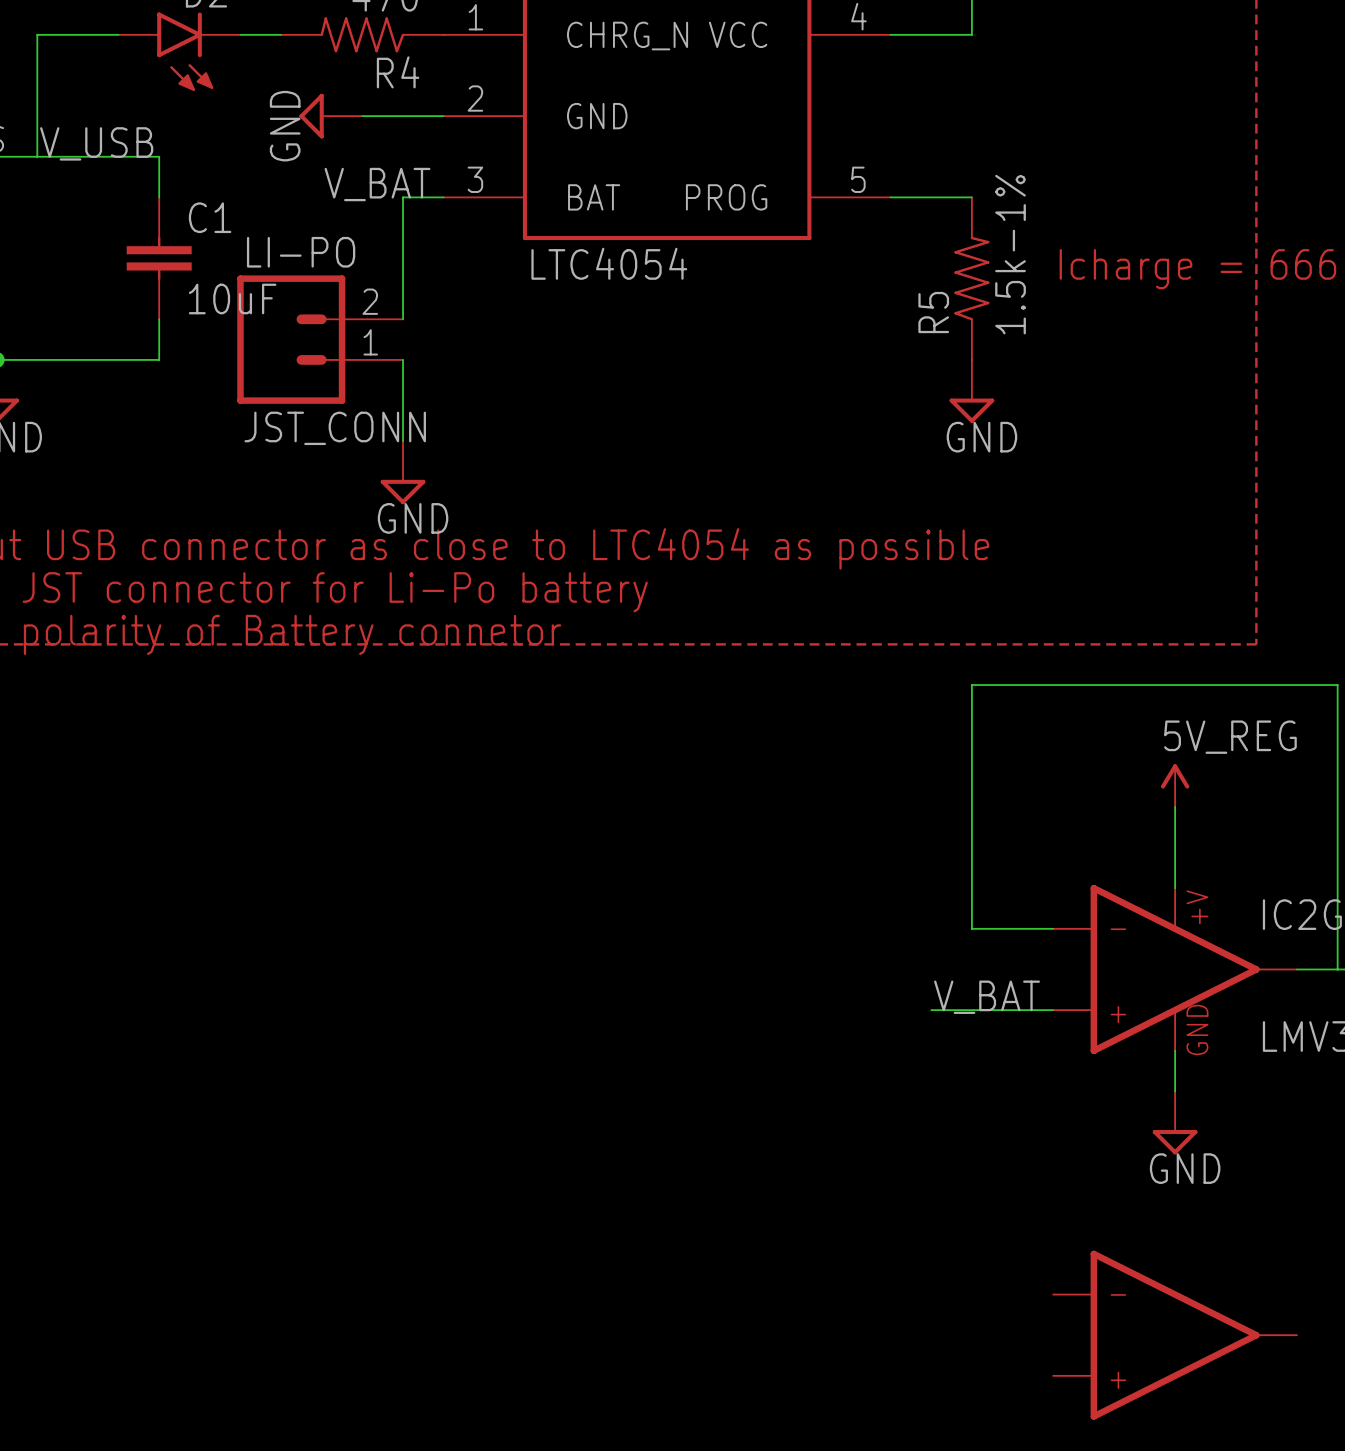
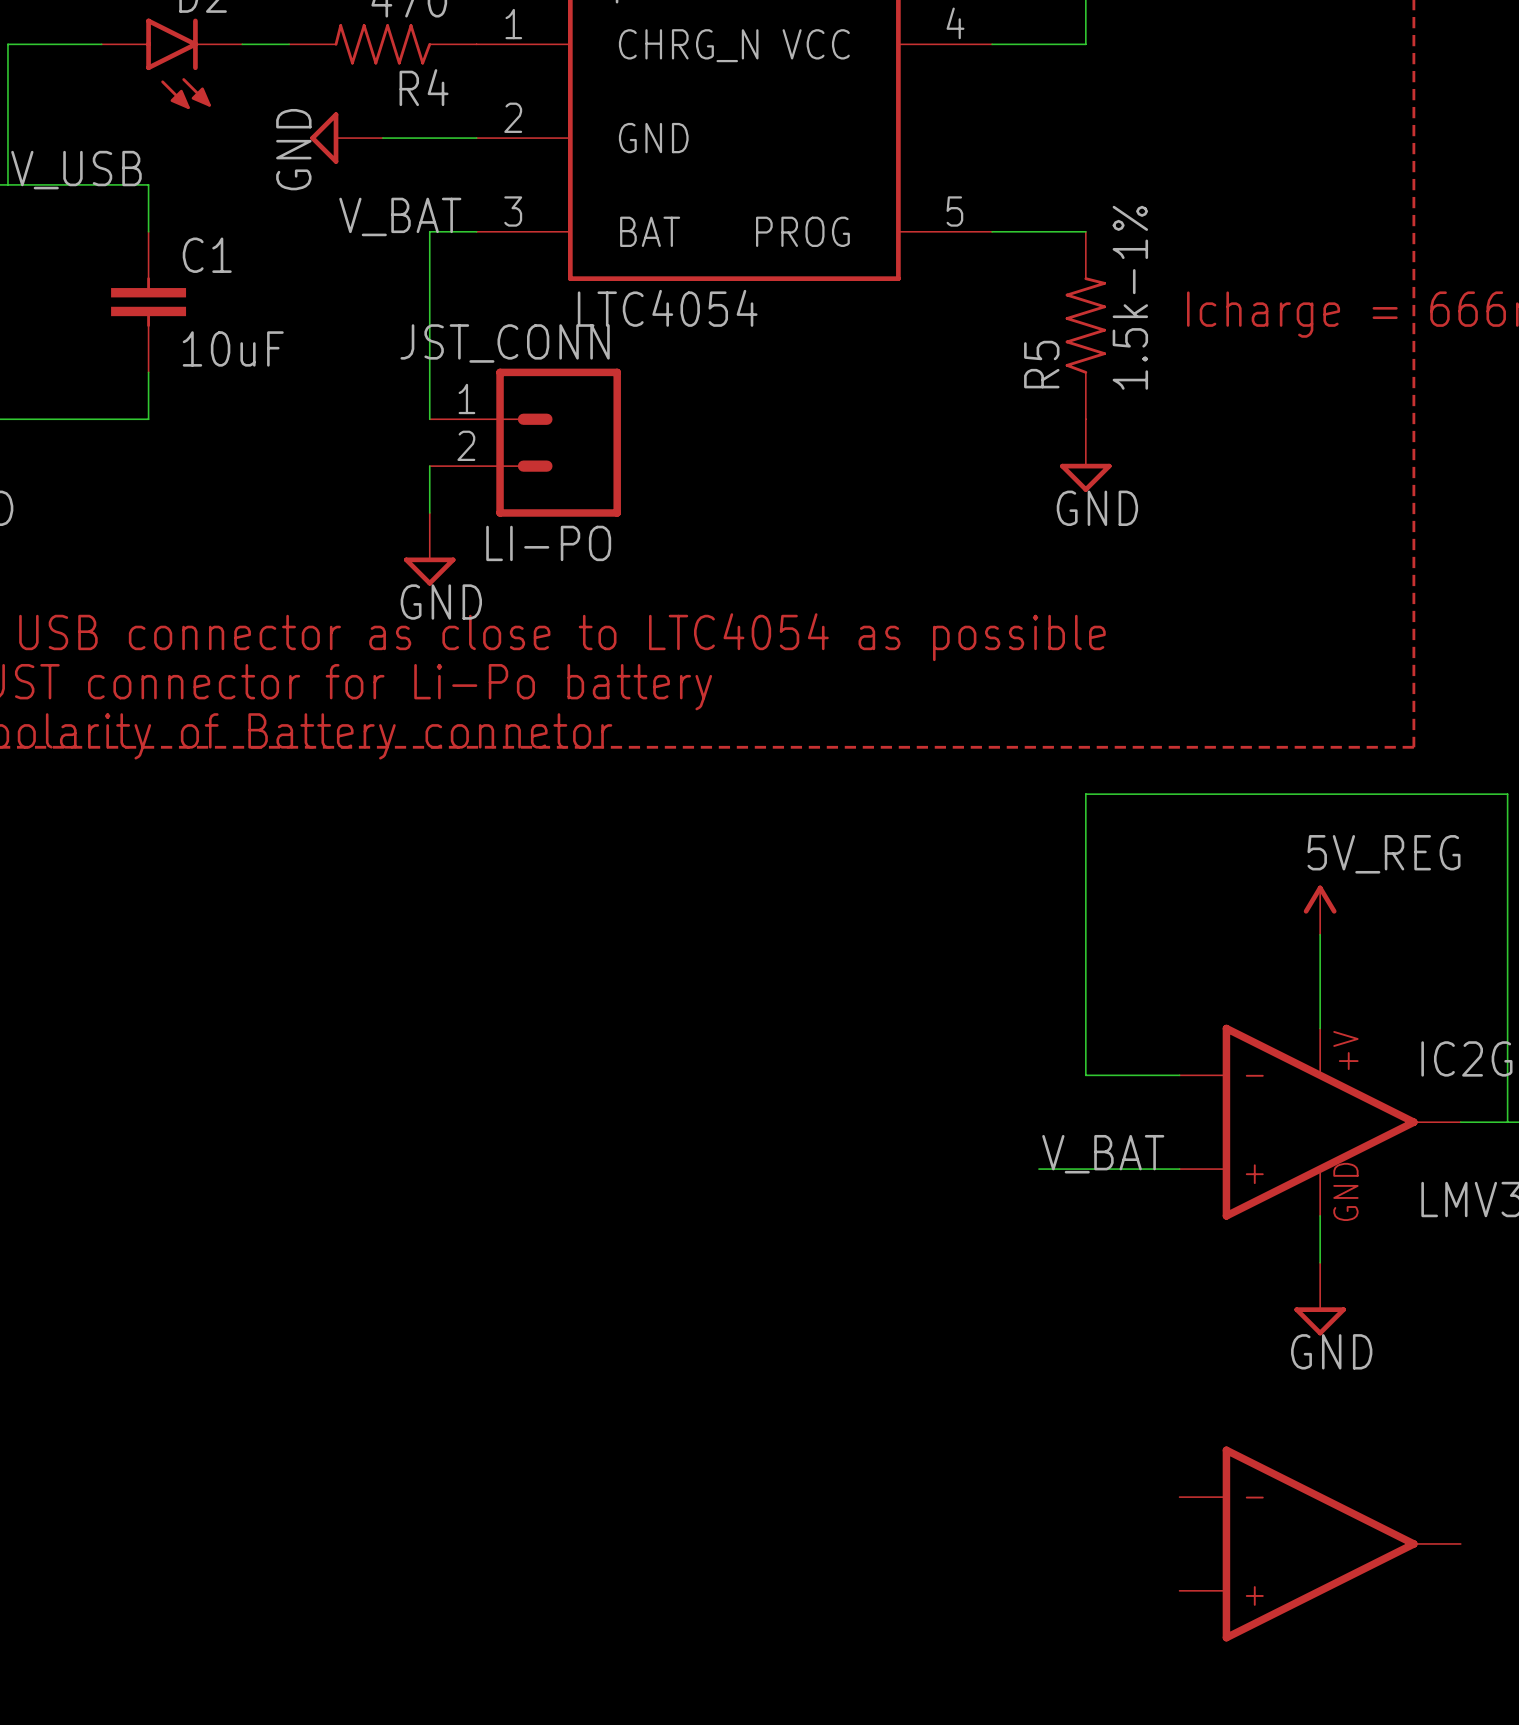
LI-PO rotation: 0° (291, 339) -> 180° (558, 442)
LI-PO position: (320, 339) -> (525, 442)
wire: (403, 359) (403, 400) -> (429, 419) (429, 372)

